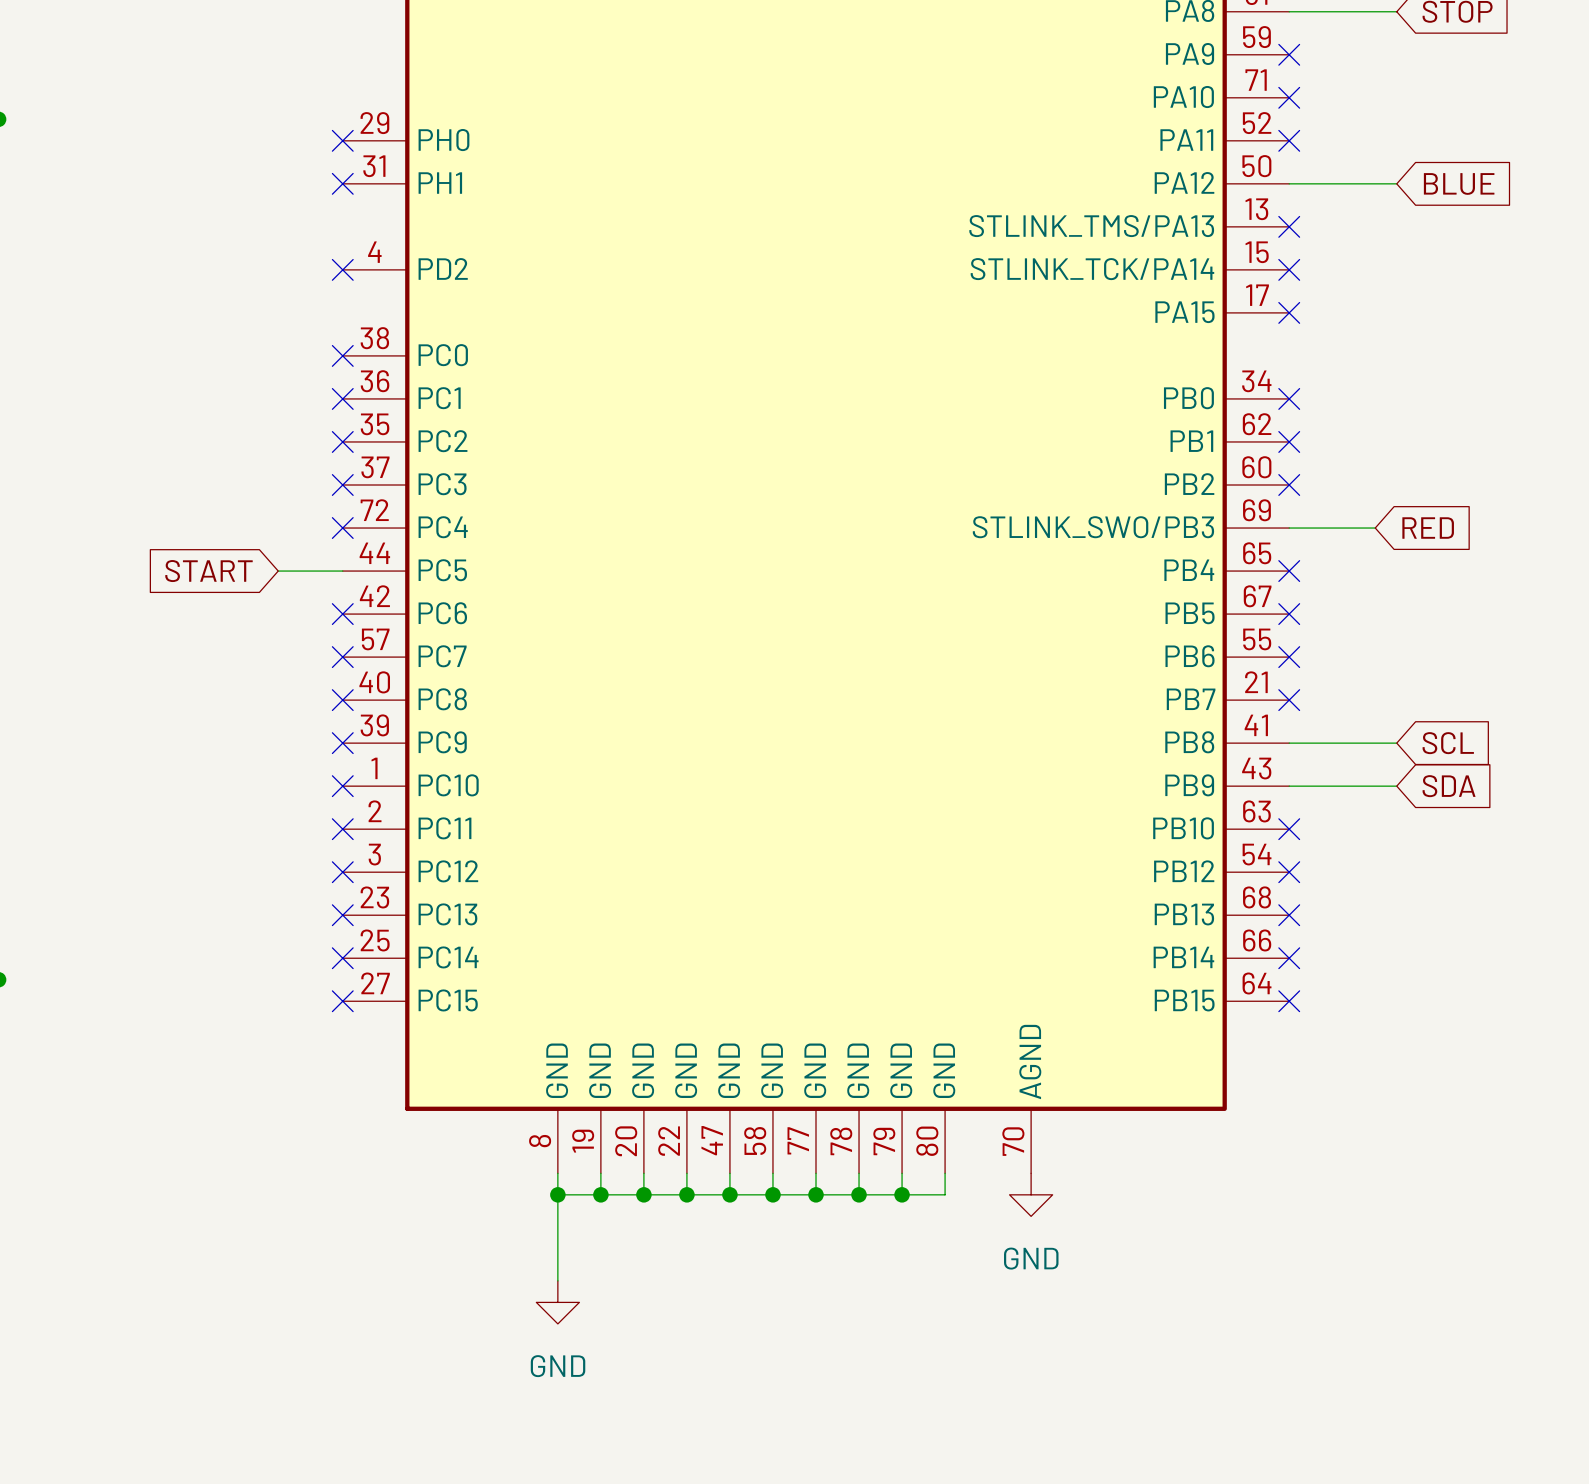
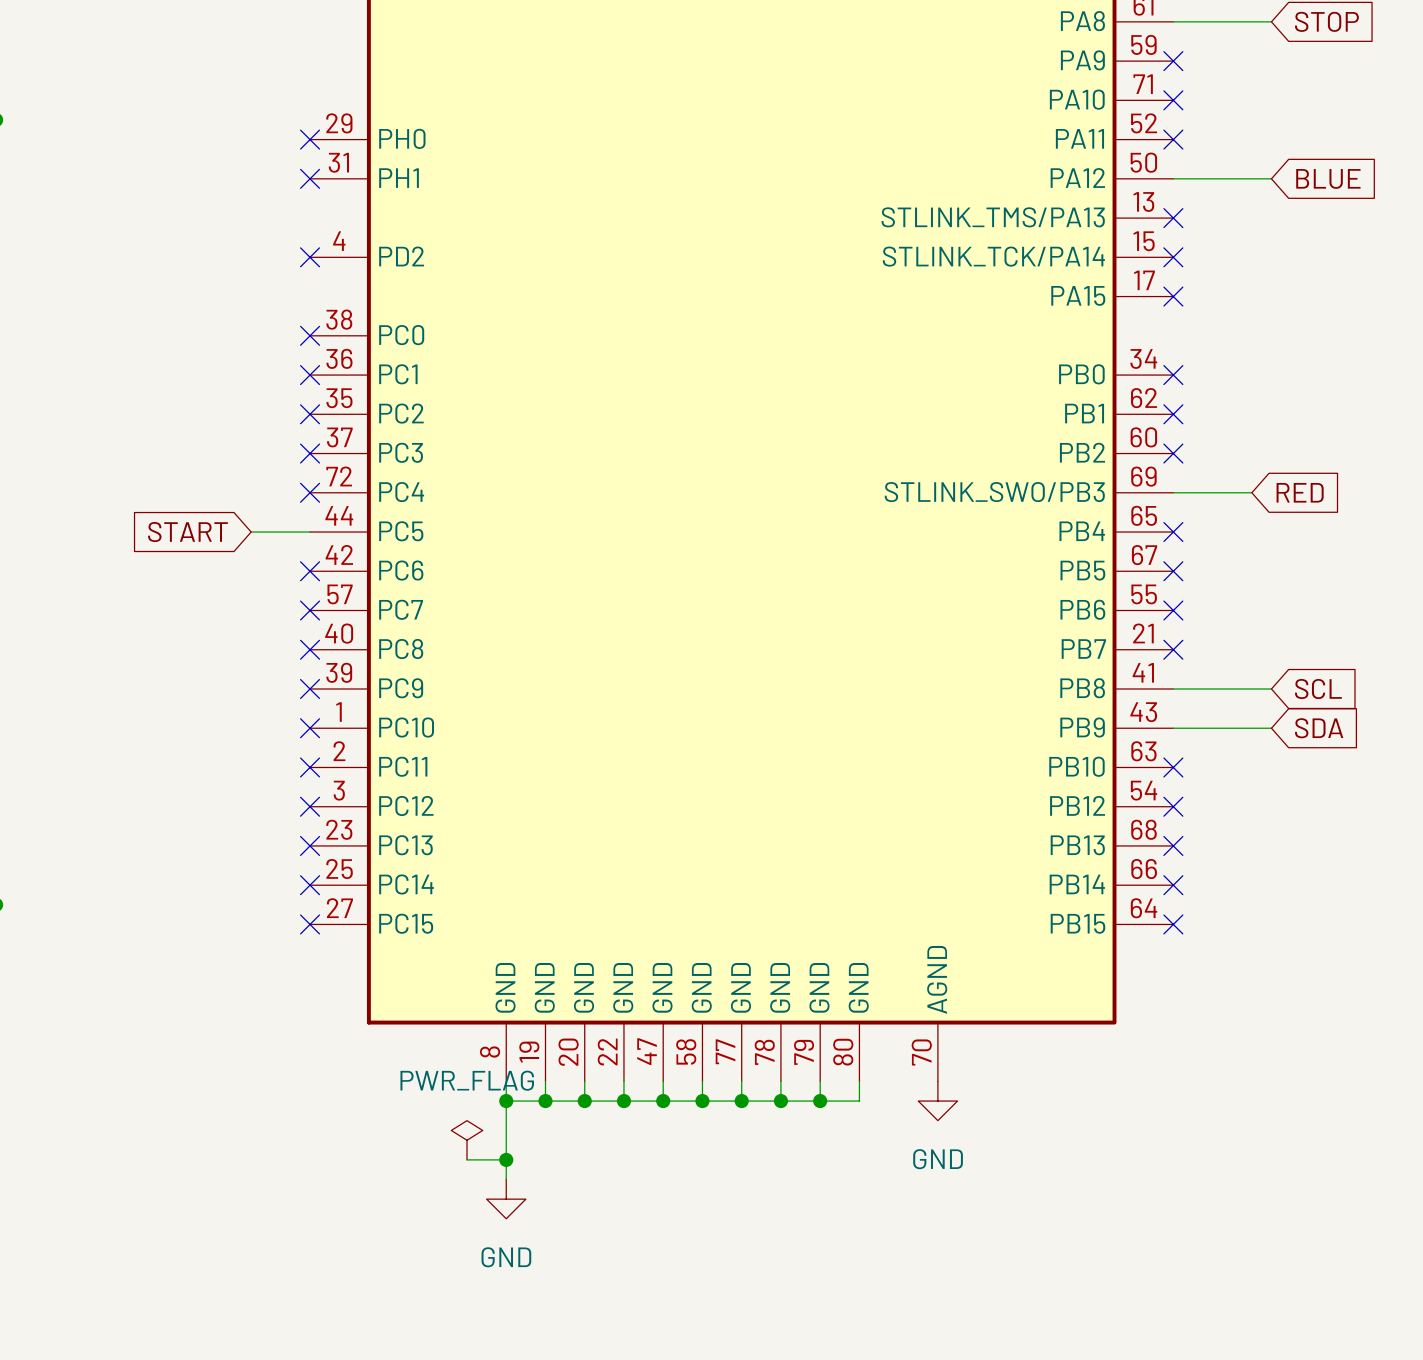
power symbol: none -> PWR_FLAG (467, 1140)
wire: none -> (467, 1159) (506, 1159)
junction: none -> (506, 1159)

